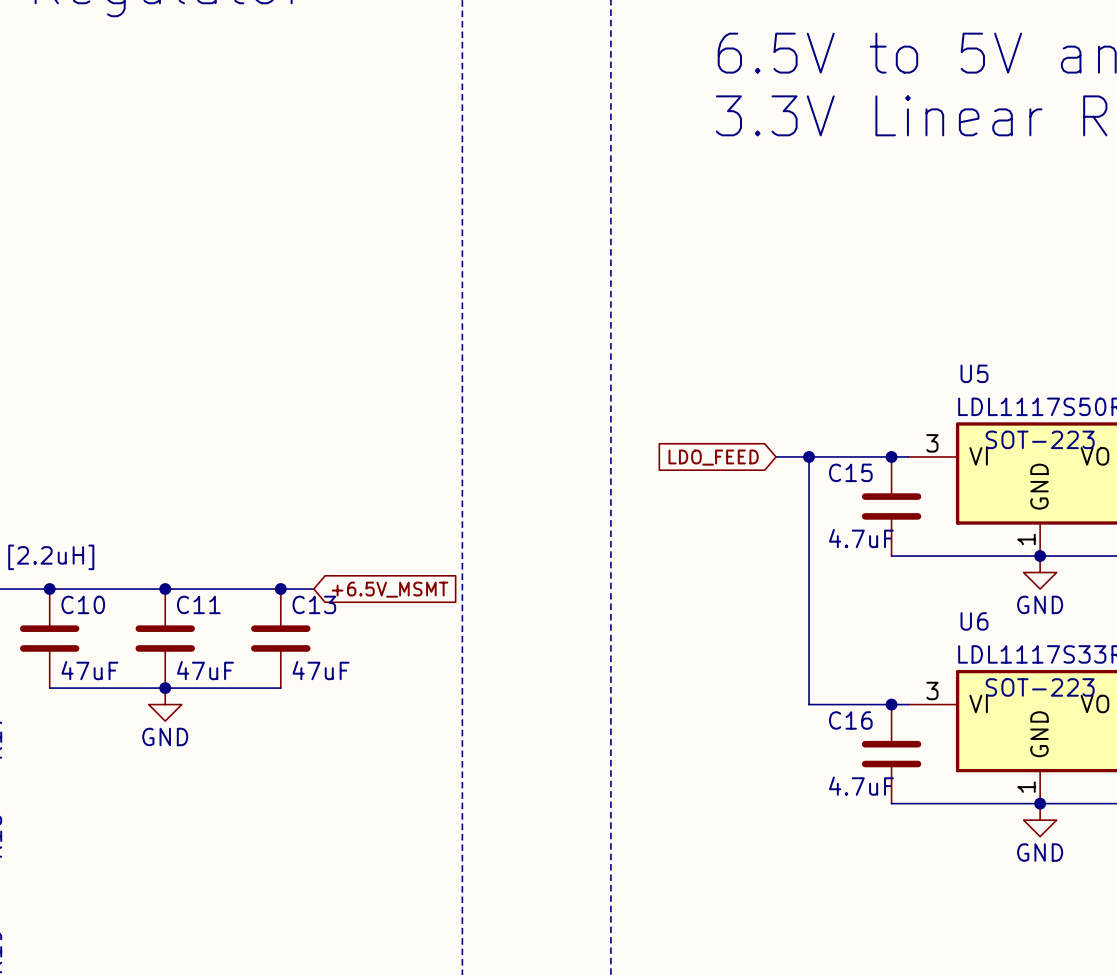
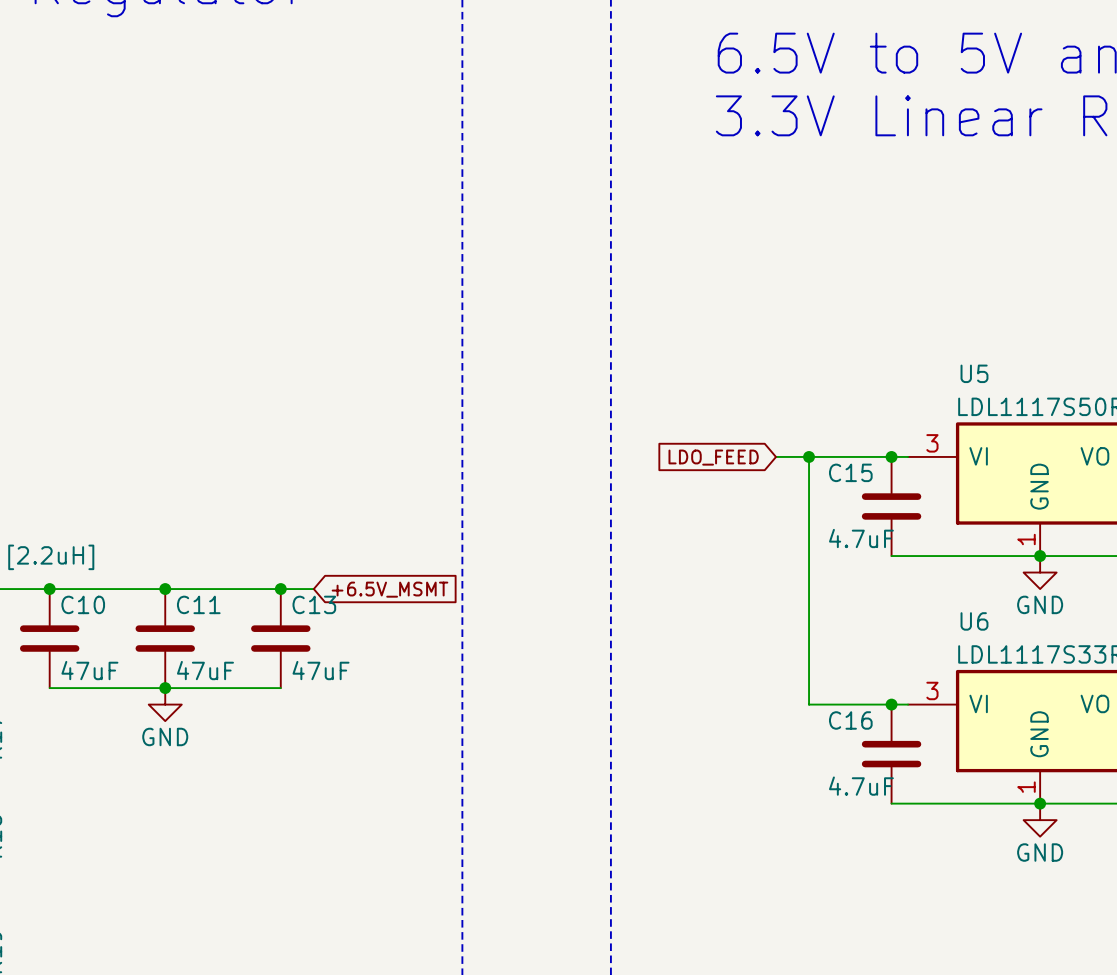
U5 text: SOT-223 (1040, 439) -> none
U6 text: SOT-223 (1040, 687) -> none

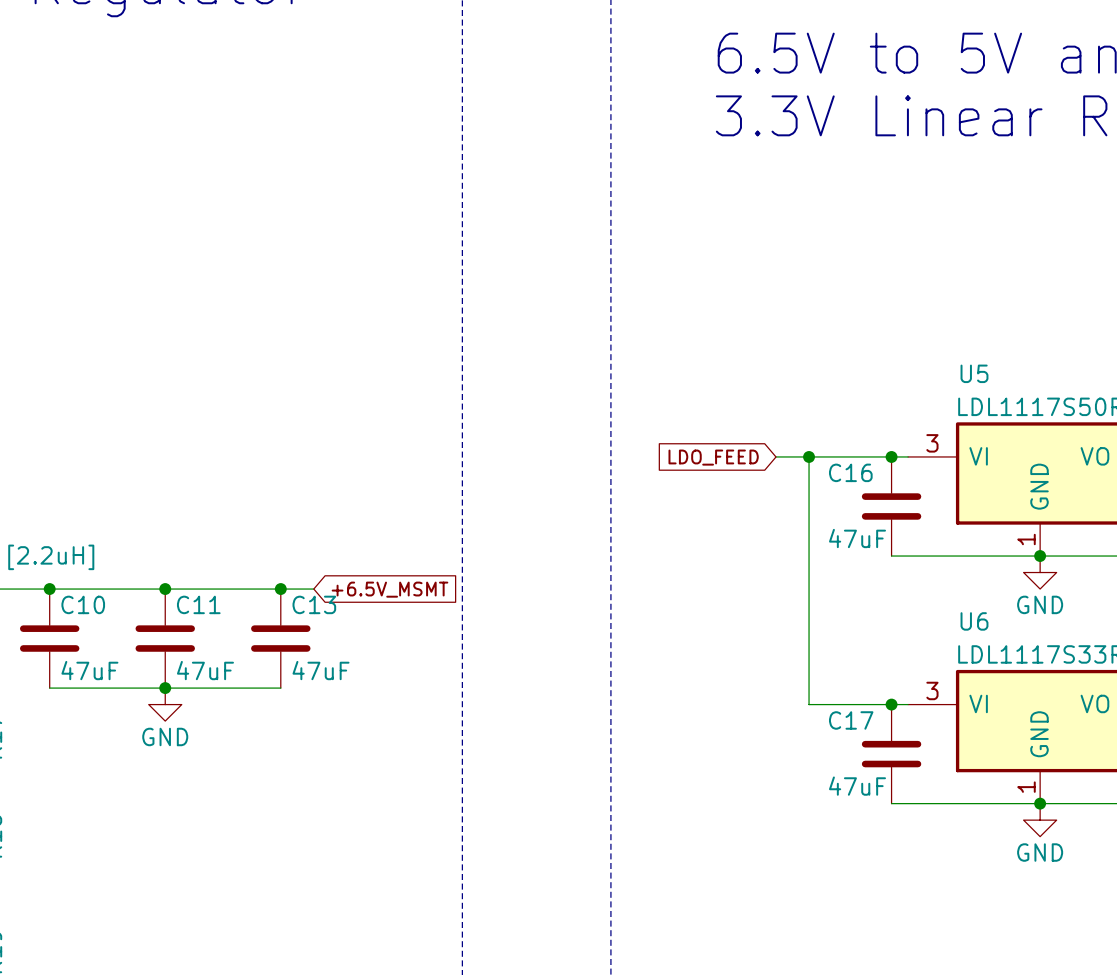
C15 name: C15 (850, 472) -> C16 (850, 472)
C15 value: 4.7uF (861, 538) -> 47uF (857, 538)
C16 name: C16 (850, 720) -> C17 (851, 720)
C16 value: 4.7uF (861, 786) -> 47uF (857, 786)

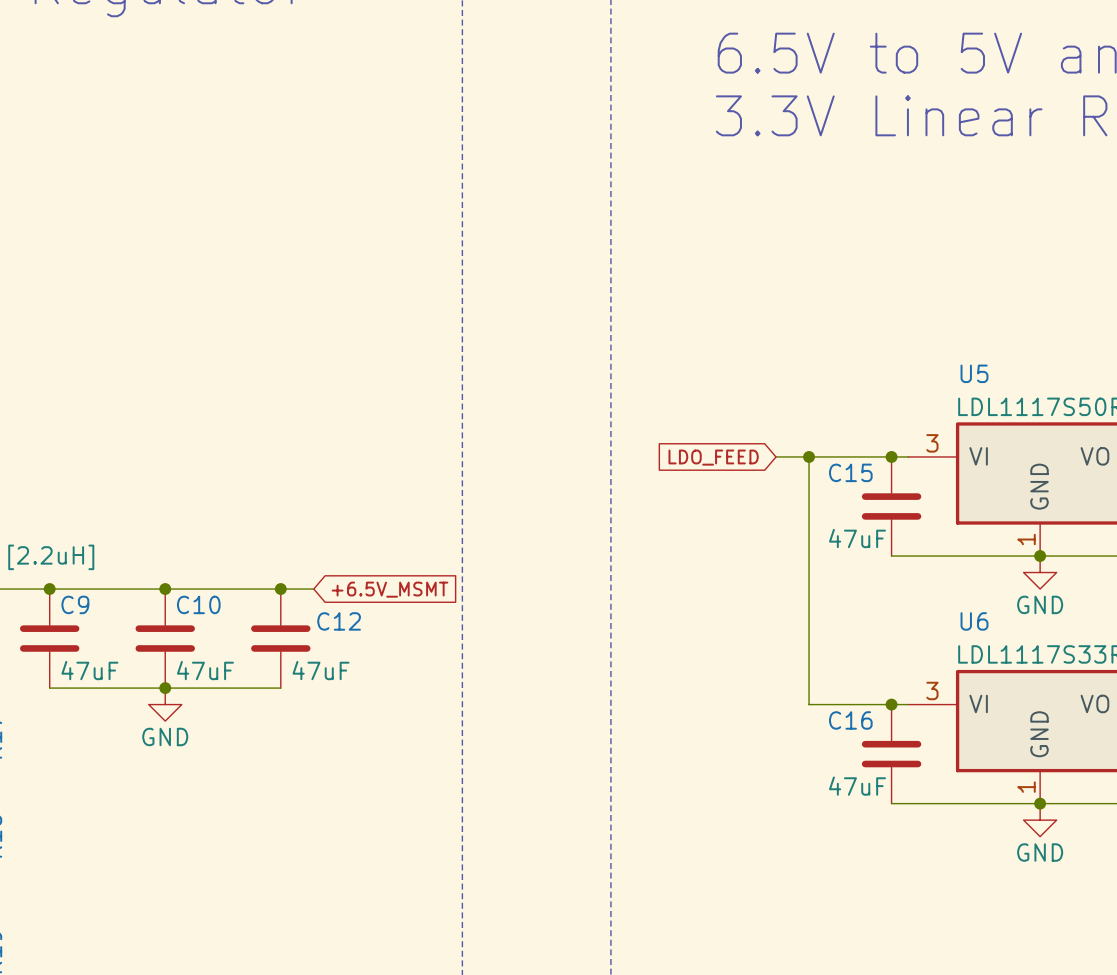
C16 name: C16 (850, 472) -> C15 (850, 472)
C10 name: C10 (83, 604) -> C9 (75, 604)
C11 name: C11 (198, 604) -> C10 (198, 604)
C13 name: C13 (314, 604) -> C12 (339, 621)
C17 name: C17 (851, 720) -> C16 (850, 720)

